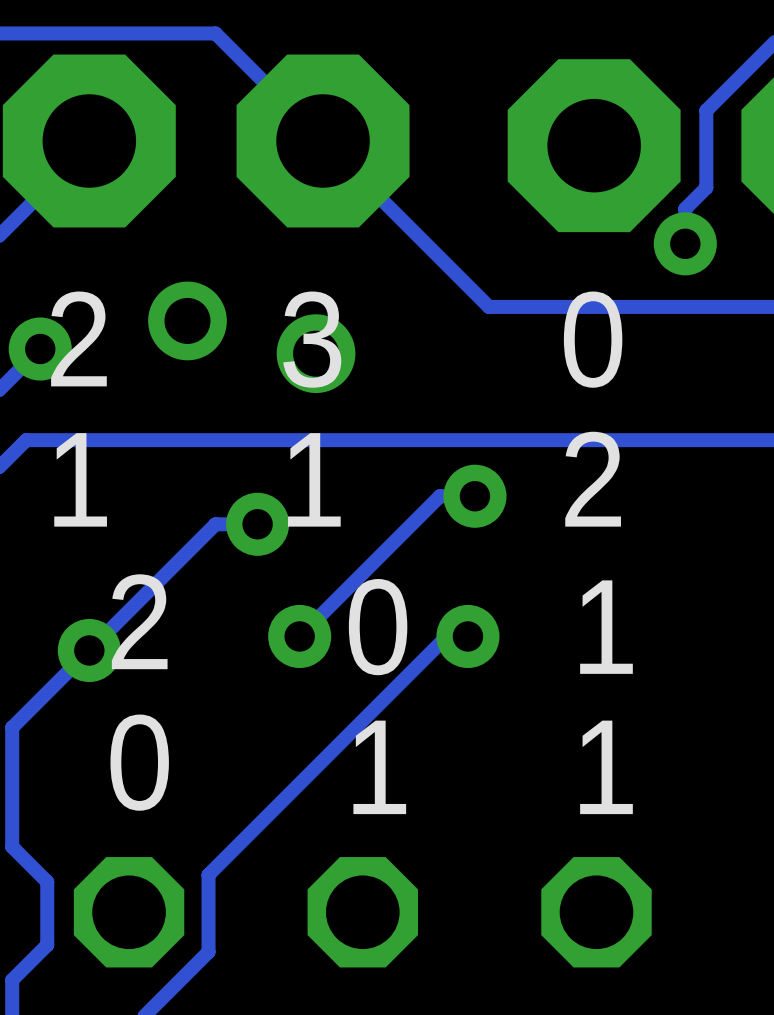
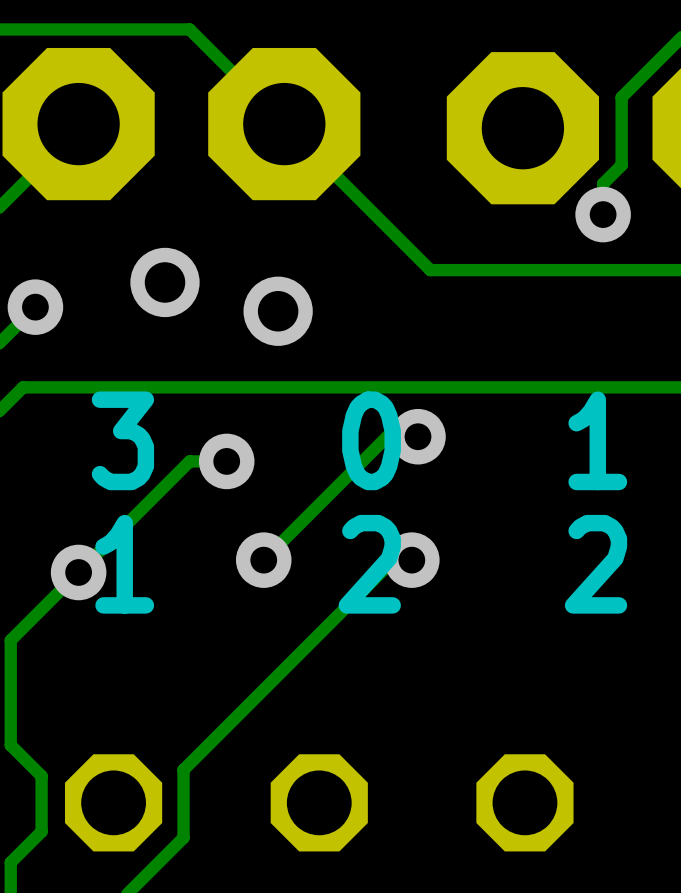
text: 2 (78, 338) -> none
text position: 3 (312, 339) -> 3 (122, 440)
text: 0 (593, 339) -> none
text: 1 (80, 479) -> none
text: 1 (314, 479) -> none
text: 2 (593, 479) -> none
text: none -> 0 (371, 440)
text: none -> 1 (597, 440)
text: 2 (139, 621) -> 1 (124, 564)
text: 0 (378, 627) -> 2 (369, 564)
text: 1 (606, 627) -> 2 (596, 564)
text: 0 (139, 762) -> none
text: 1 (379, 767) -> none
text: 1 (606, 767) -> none

